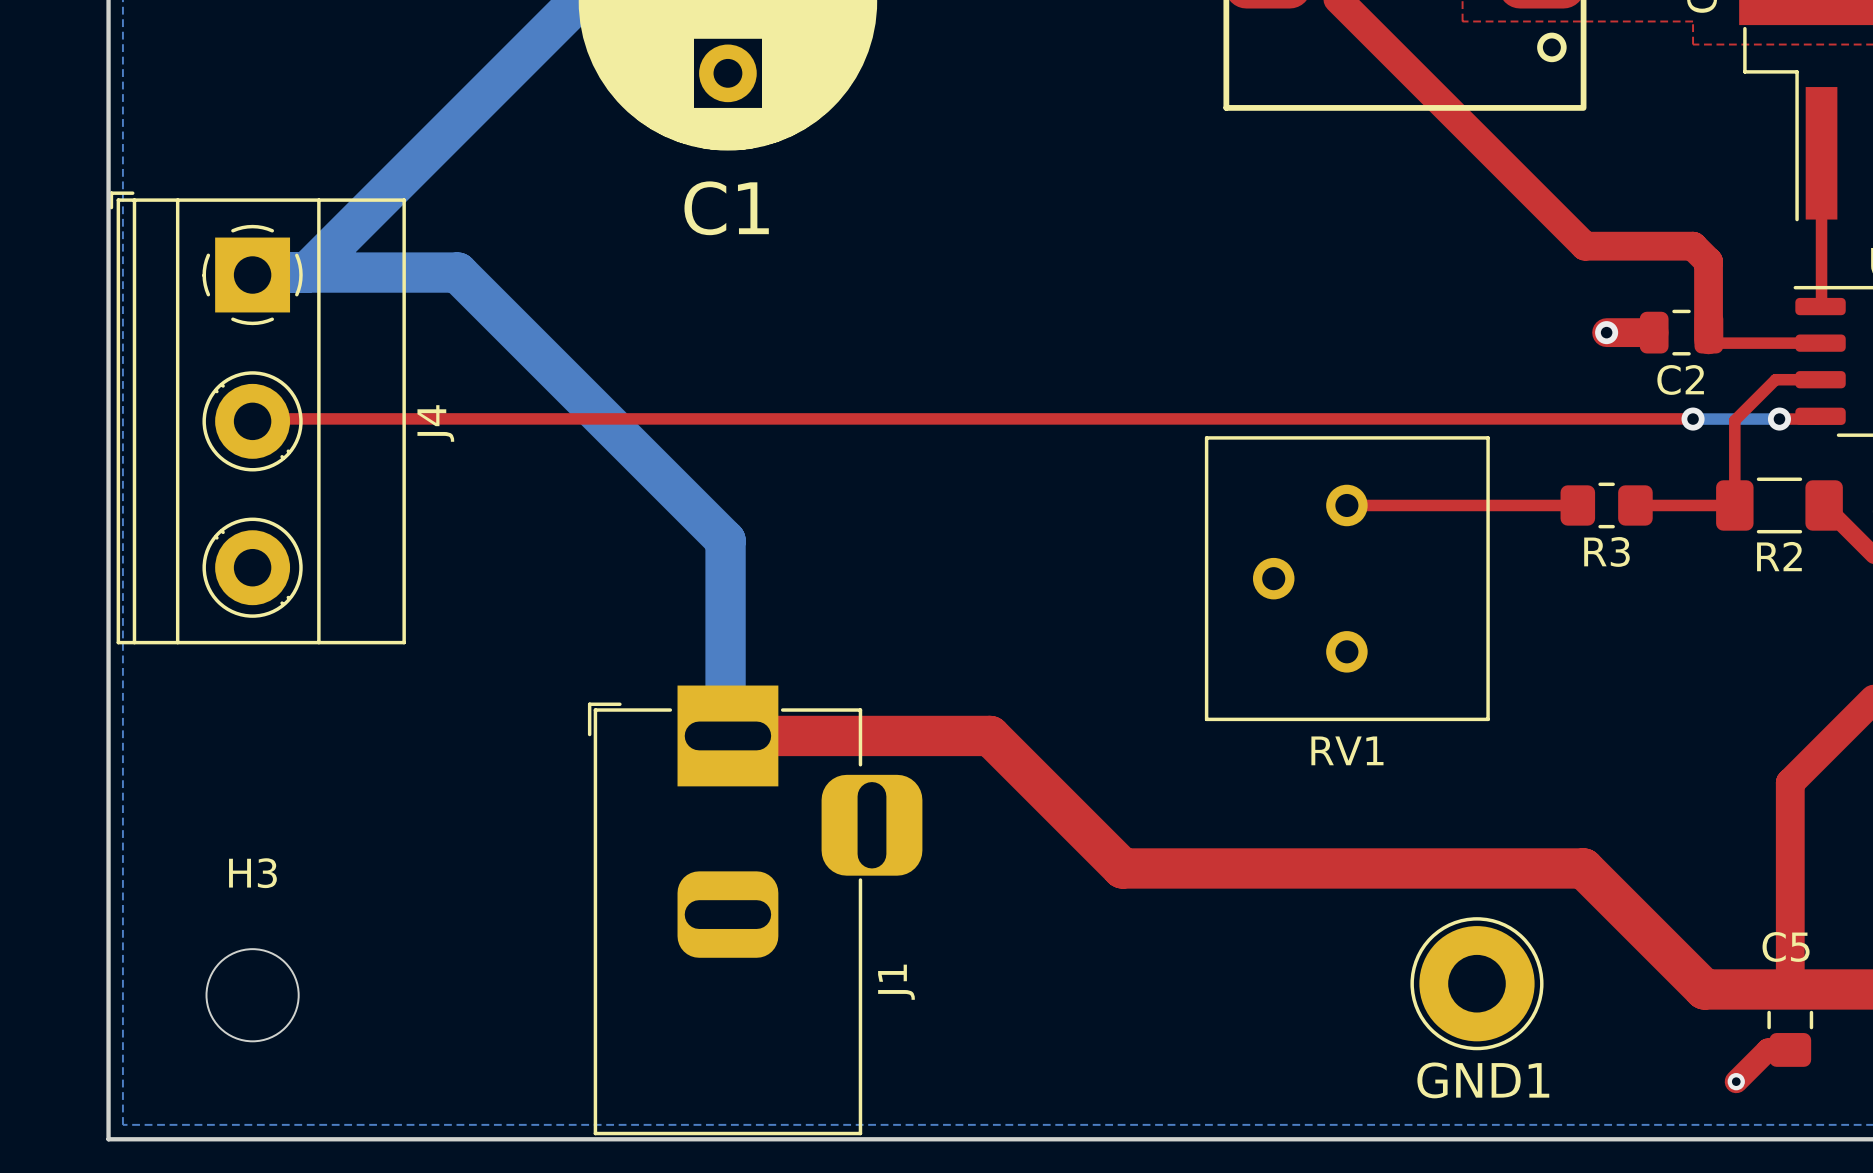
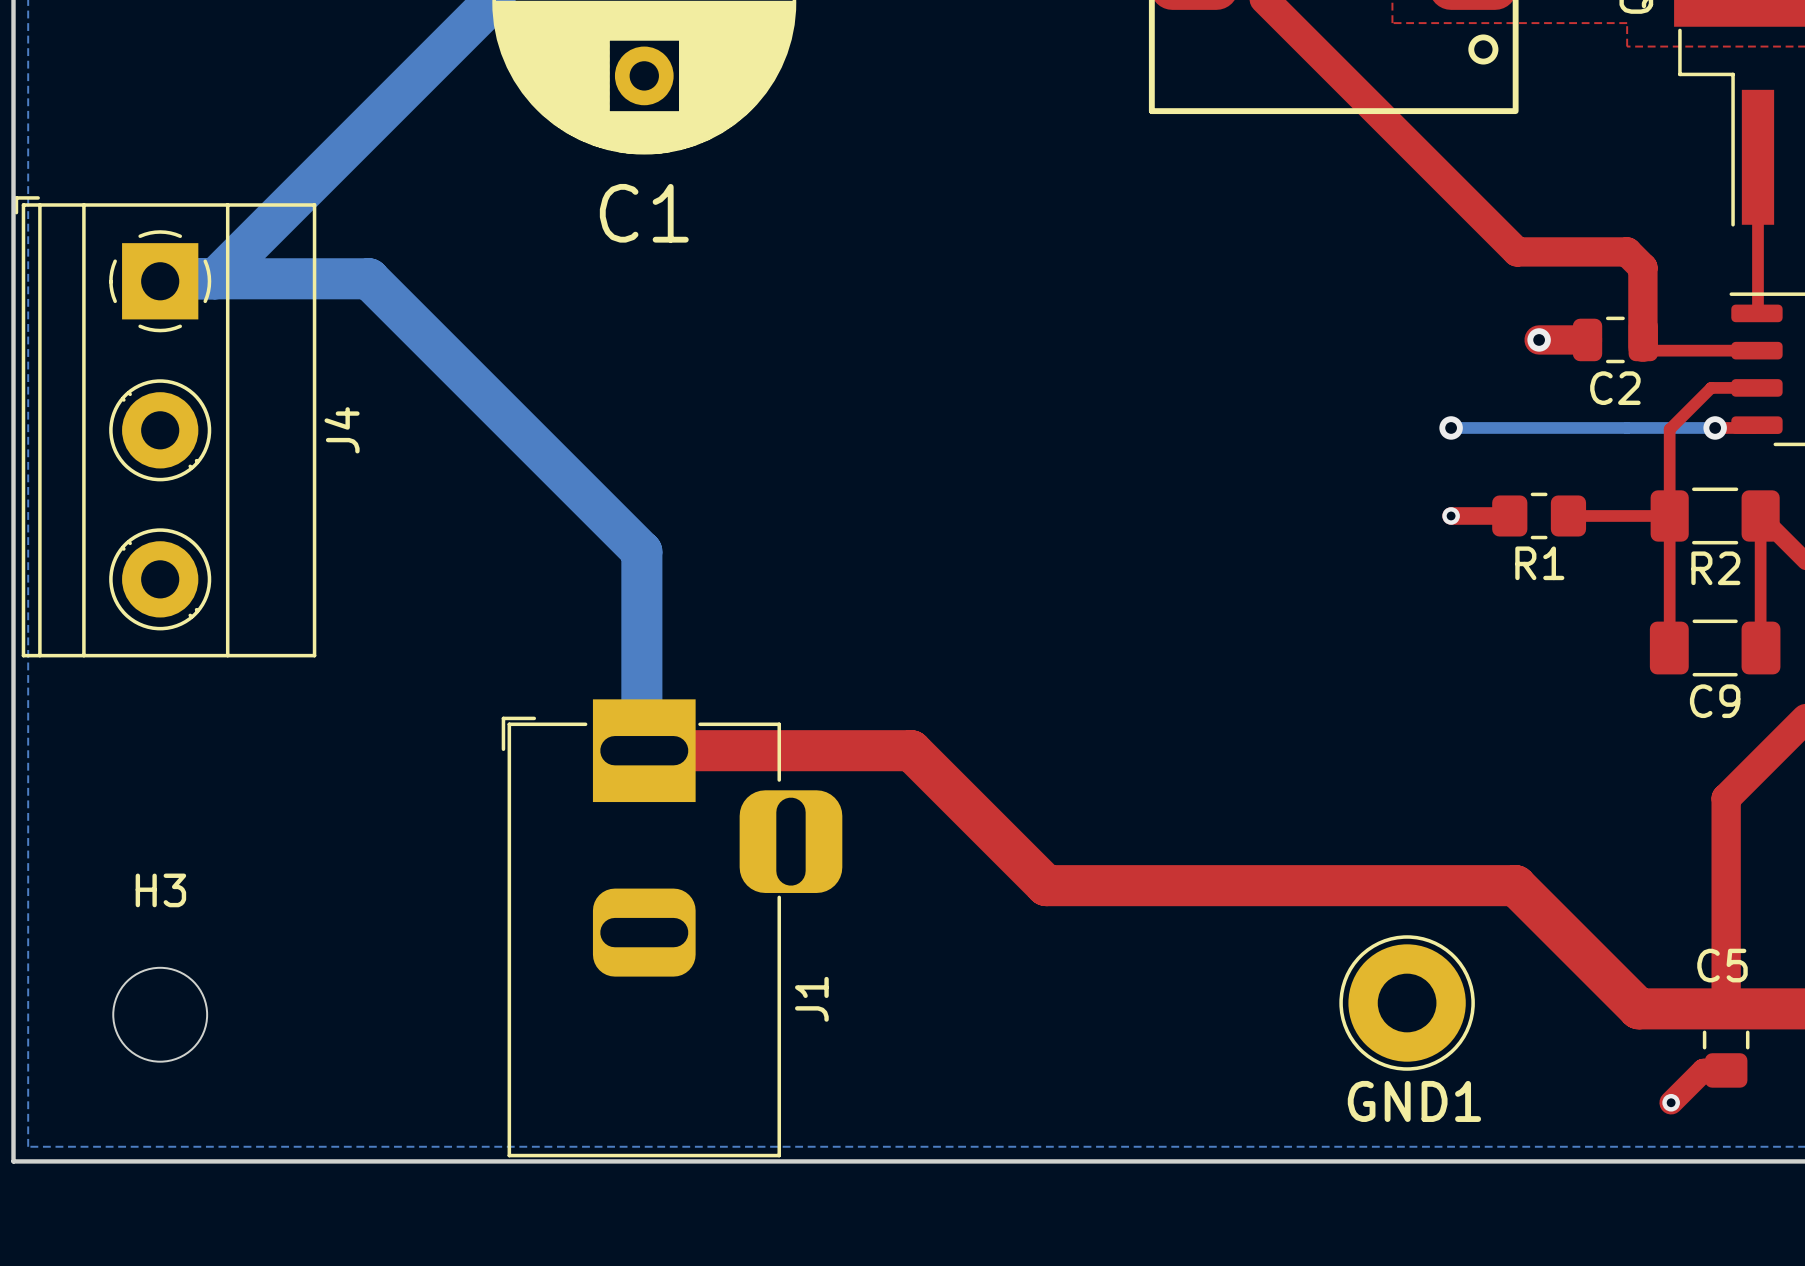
top track: (243, 418) (1692, 418) -> none
bottom track: none -> (1451, 427) (1627, 427)
via position: (1693, 419) -> (1451, 427)
top track: (1346, 505) (1520, 505) -> none
top track width: thin (1520, 505) (1577, 505) -> thick (1451, 515) (1509, 515)
via: none -> (1451, 515)
top track: none -> (1669, 515) (1669, 647)
top track: none -> (1760, 515) (1760, 647)
R3 name: R3 (1606, 551) -> R1 (1539, 563)
RV1: (1347, 578) -> none
C9: none -> (1715, 648)

